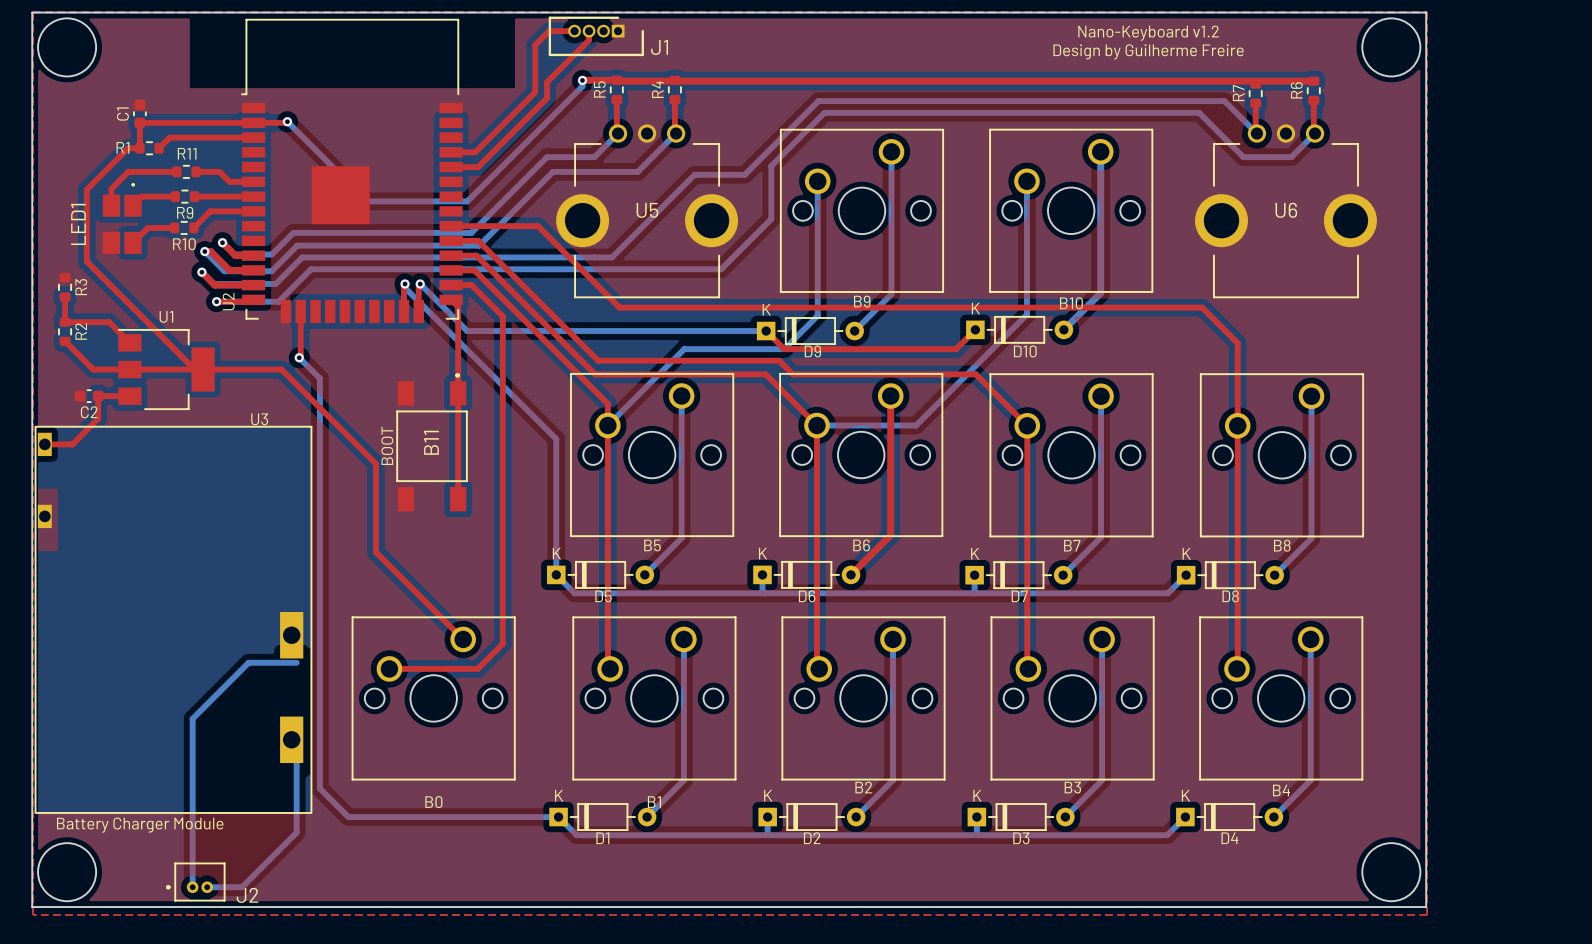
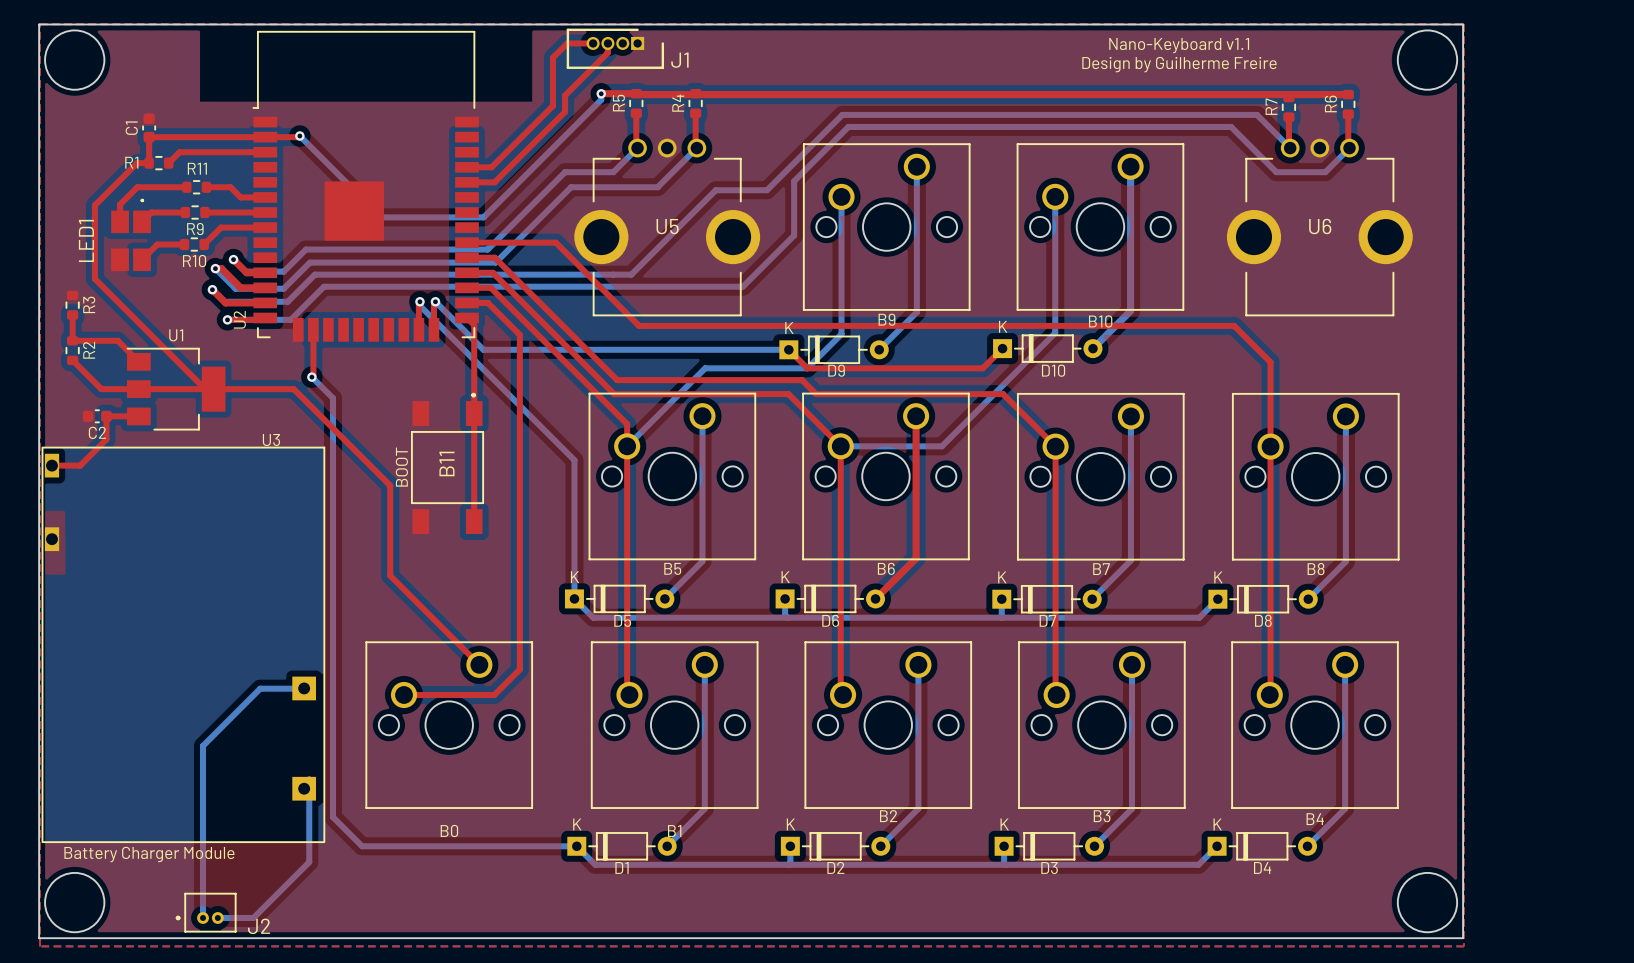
text: Nano-Keyboard v1.2 (1148, 33) -> Nano-Keyboard v1.1 (1179, 45)
U3 footprint: [34, 426, 313, 814] -> [41, 446, 326, 843]

